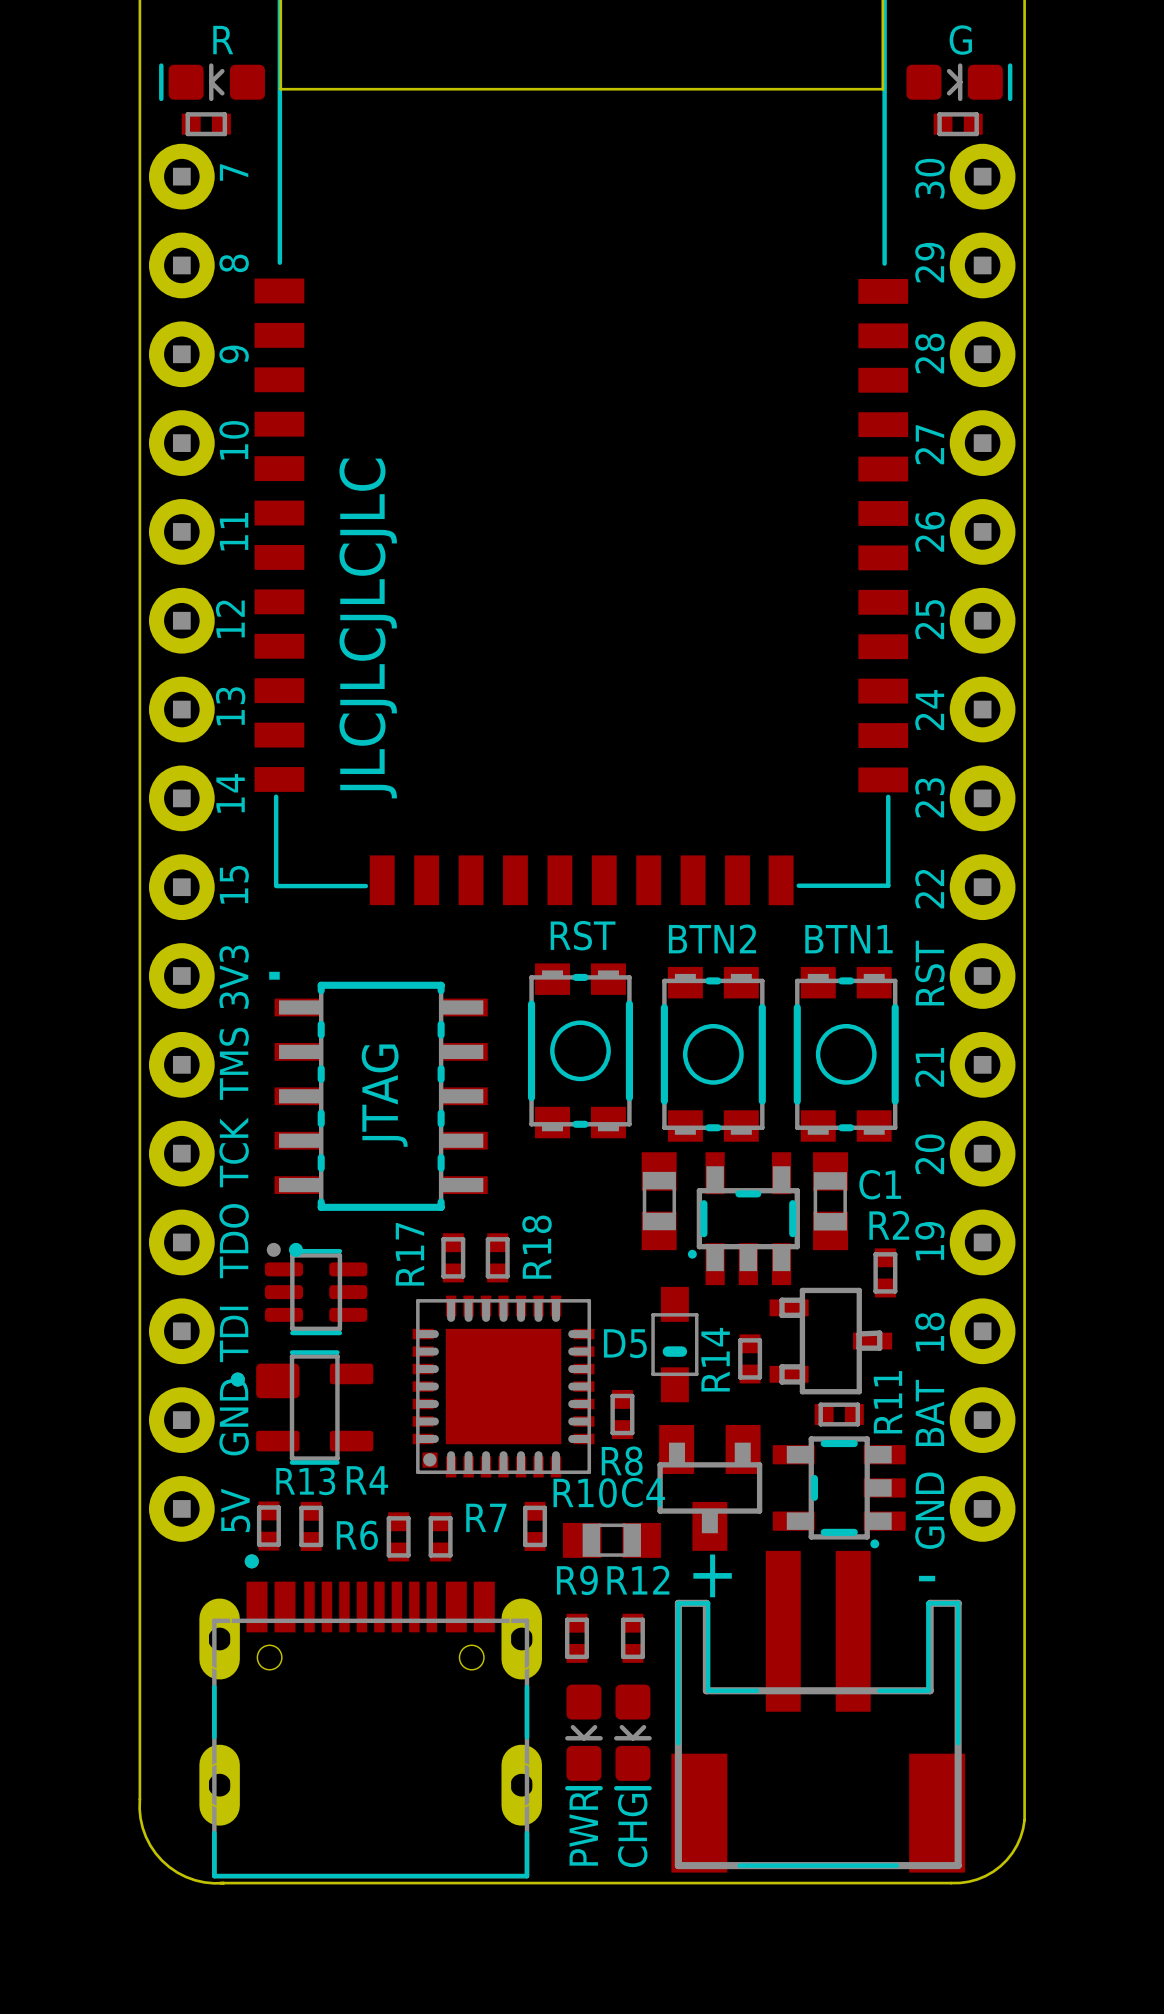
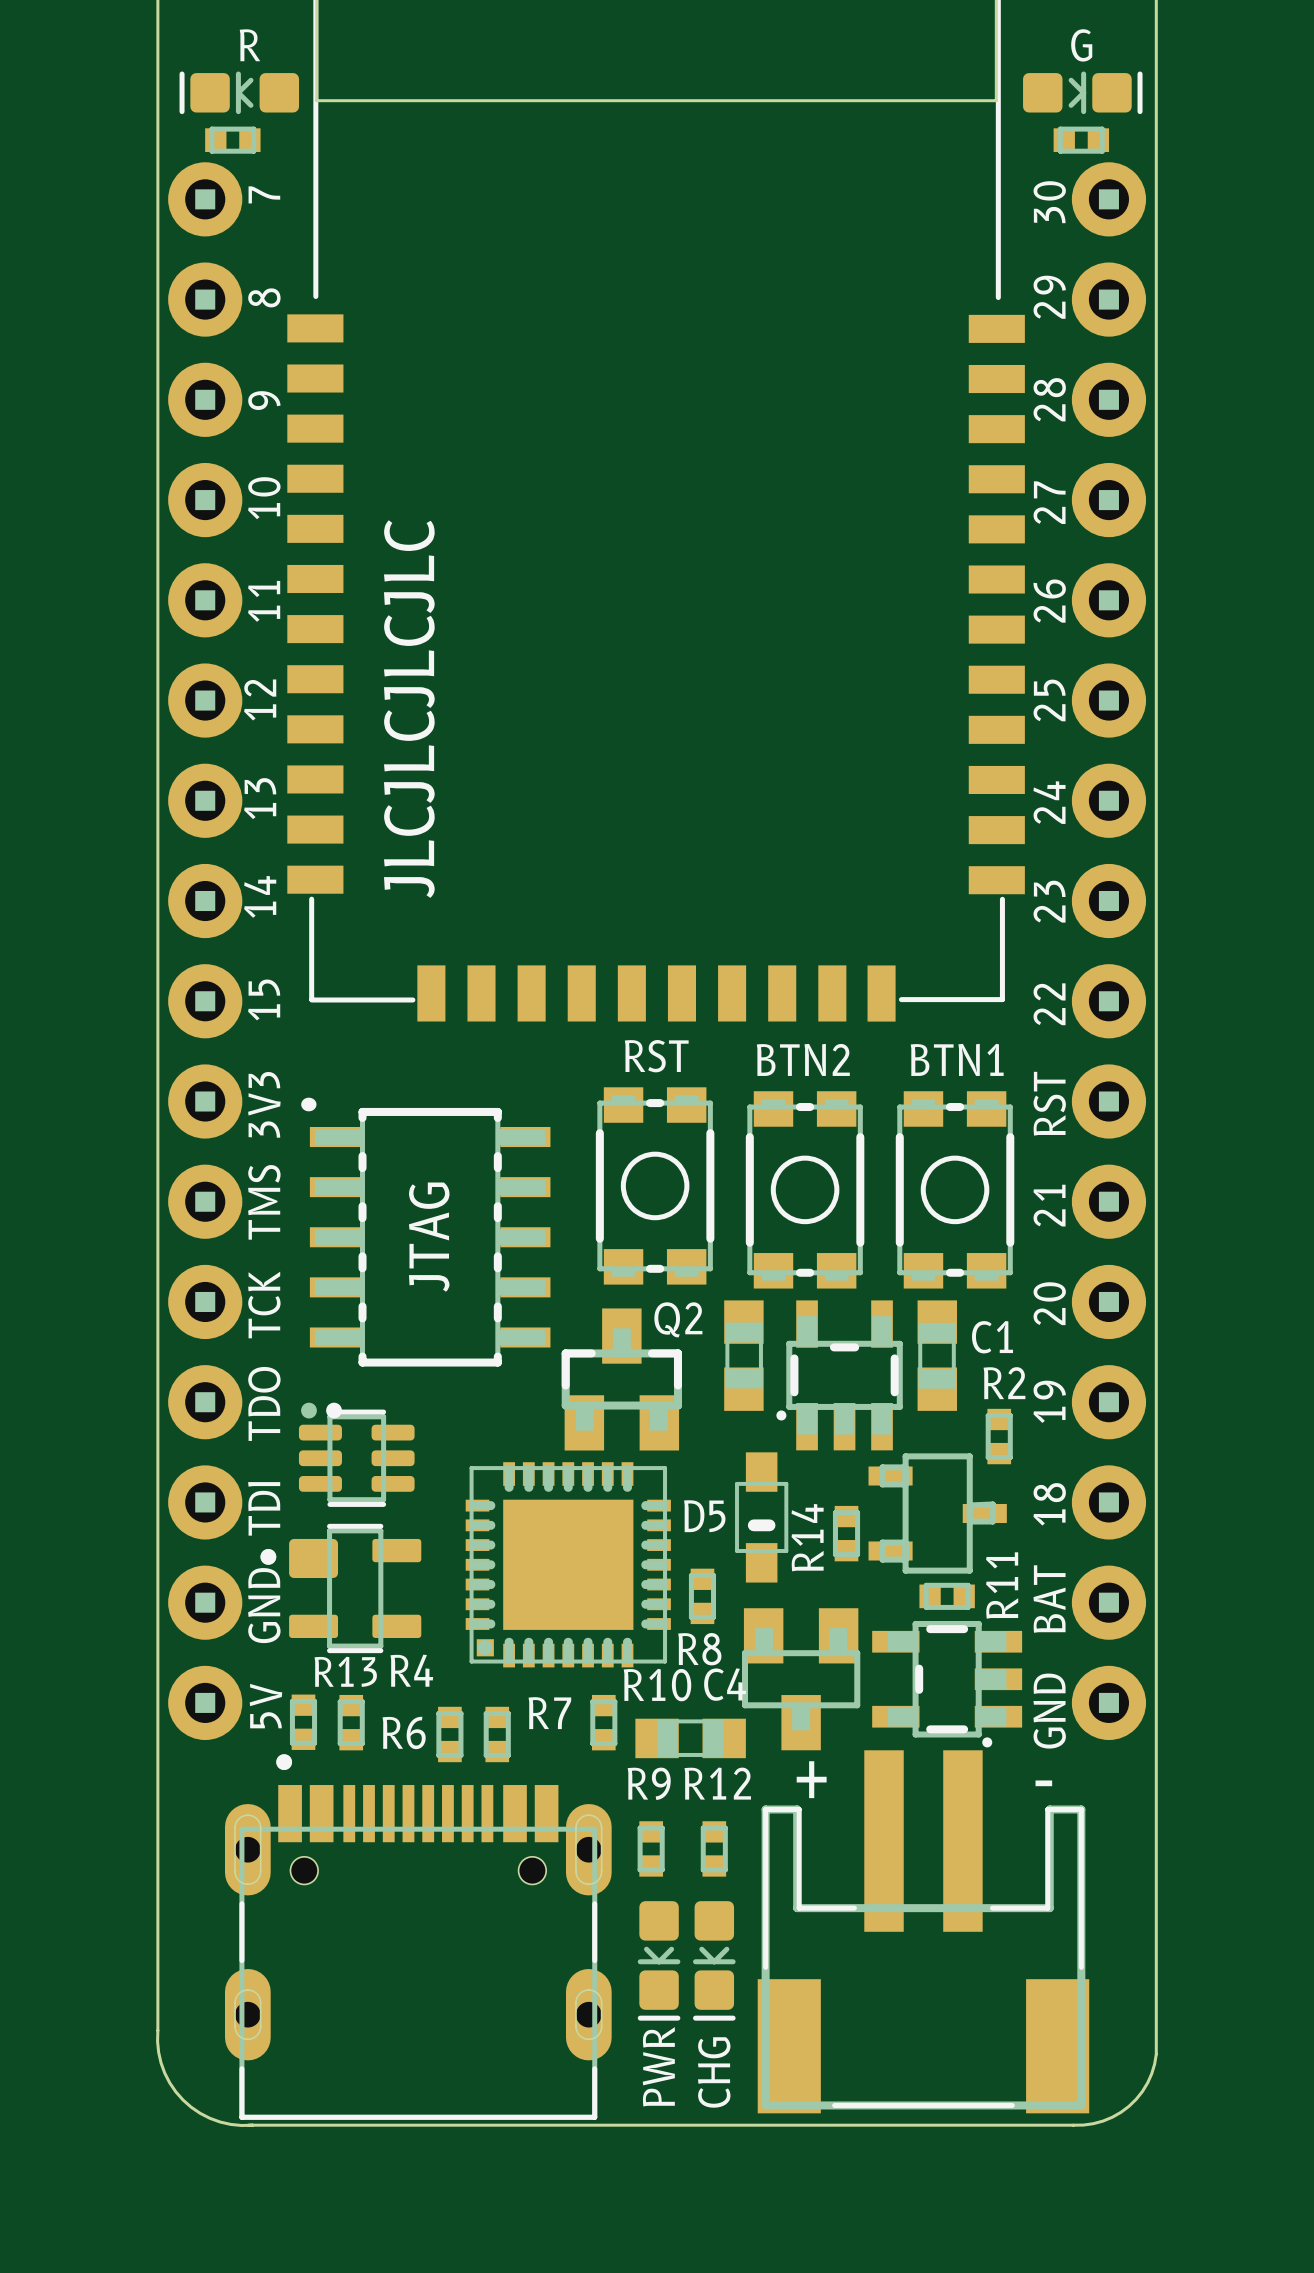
Q2: none -> (621, 1379)
R17: (453, 1257) -> none
R18: (497, 1257) -> none

